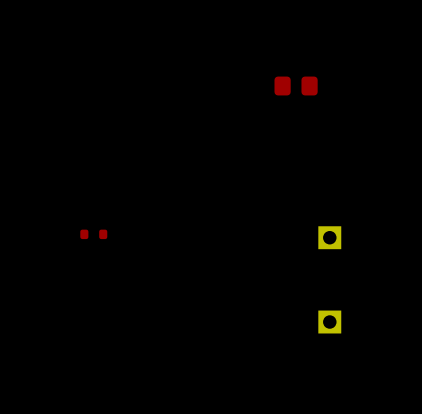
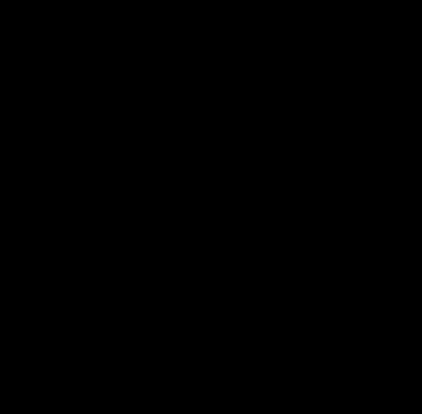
part: (296, 86) -> none
part: (93, 234) -> none
part: (329, 237) -> none
part: (329, 322) -> none

